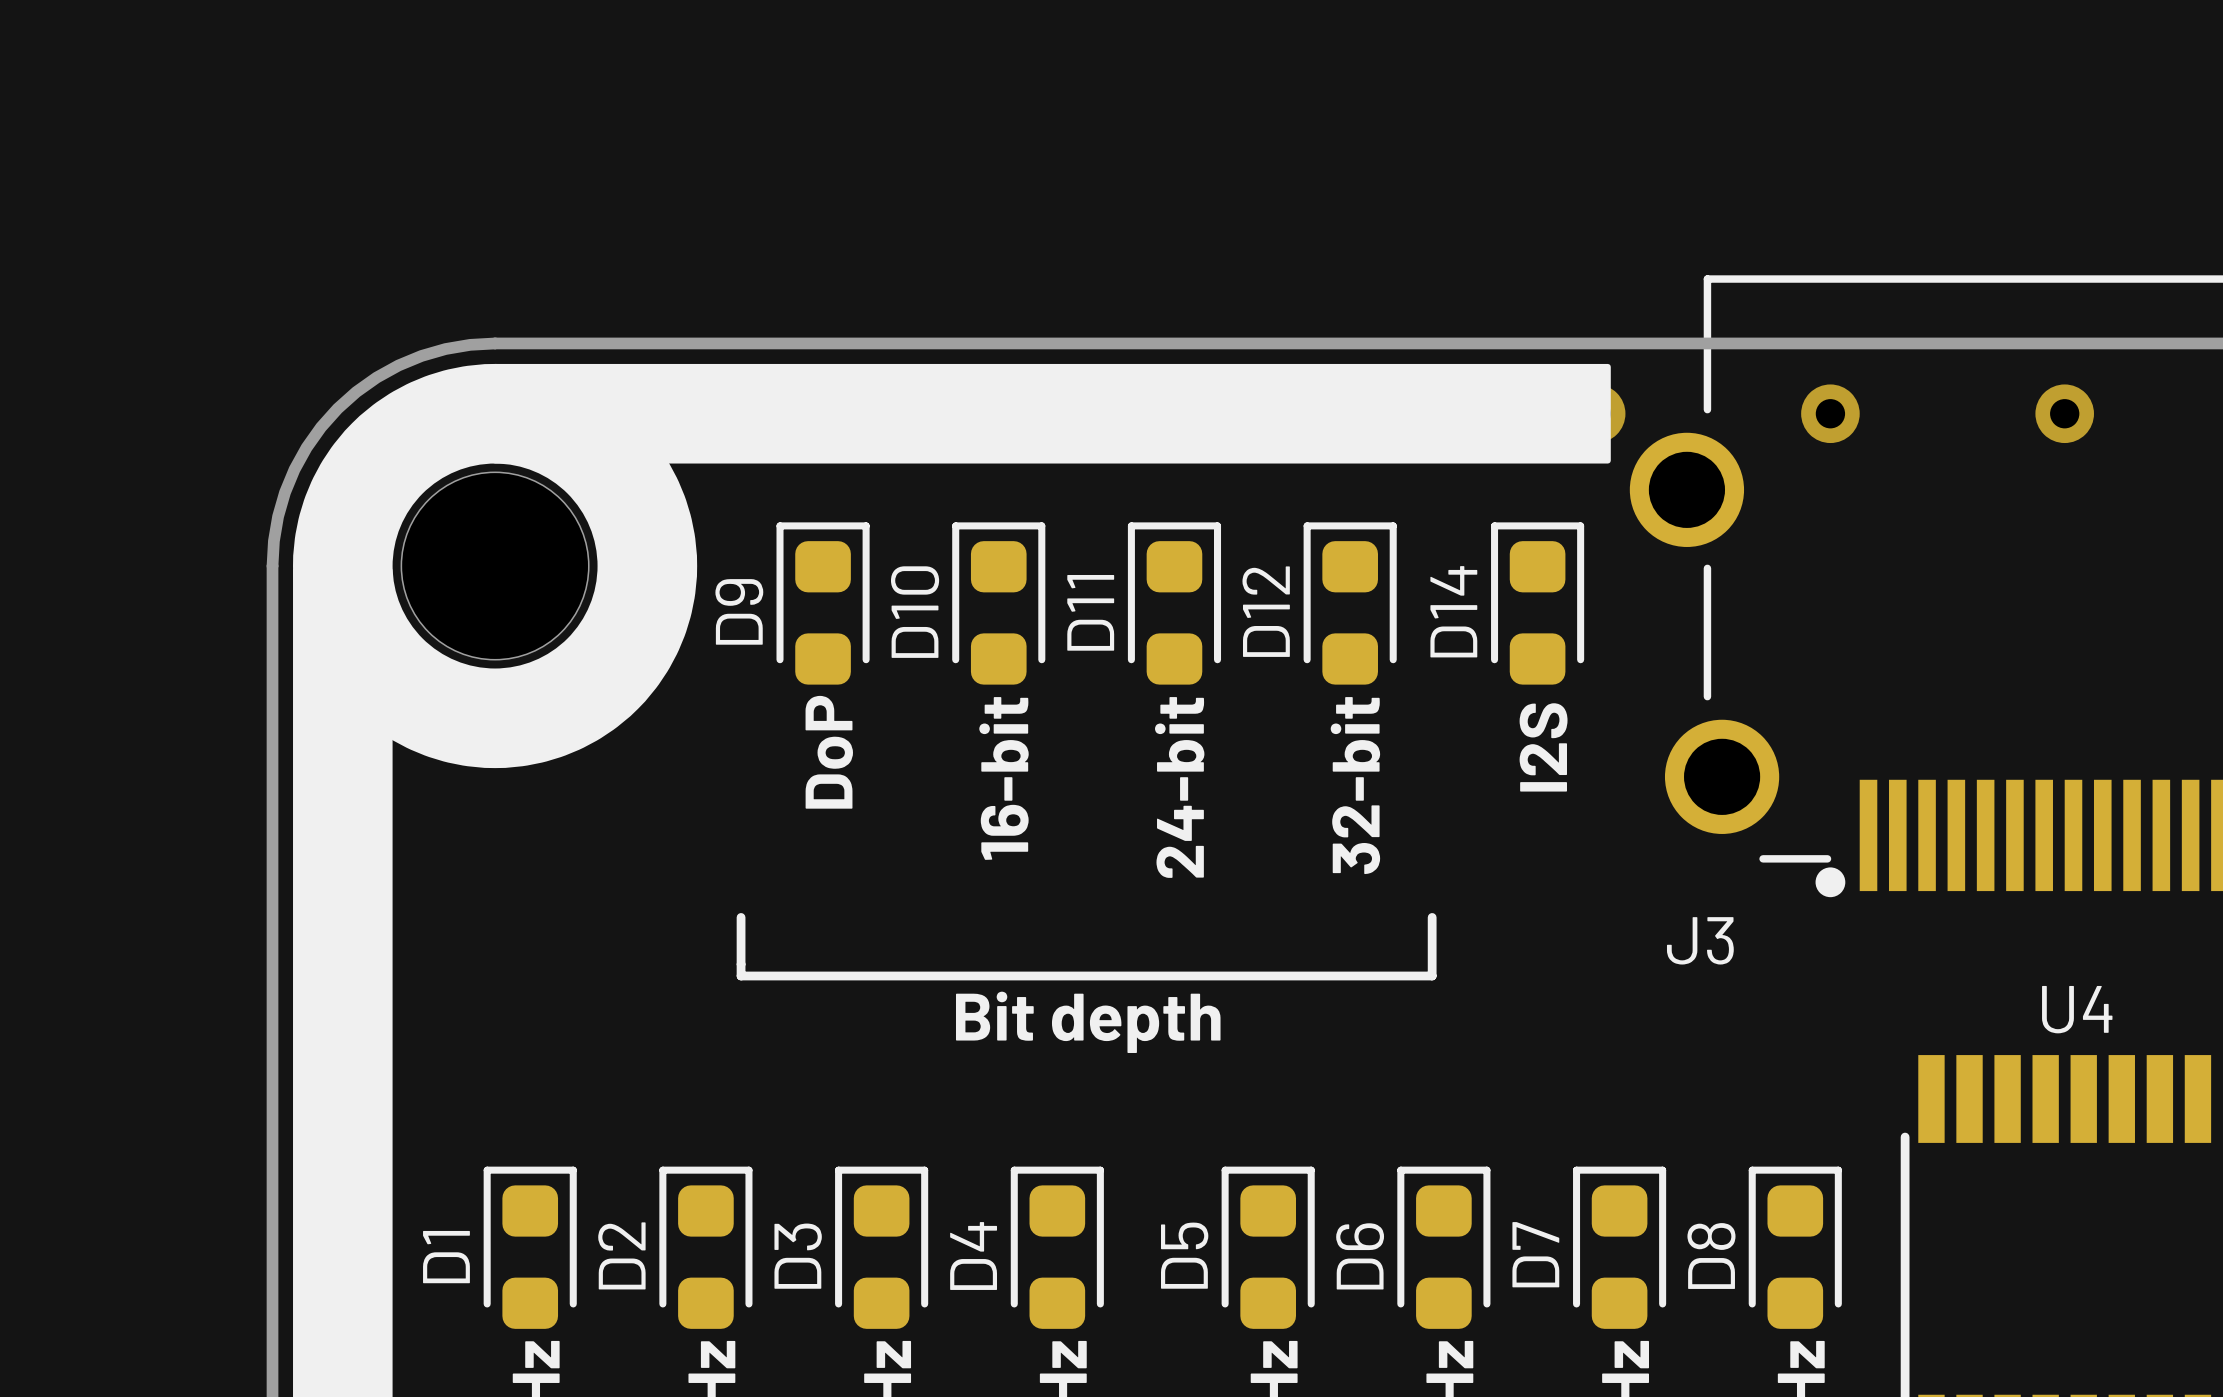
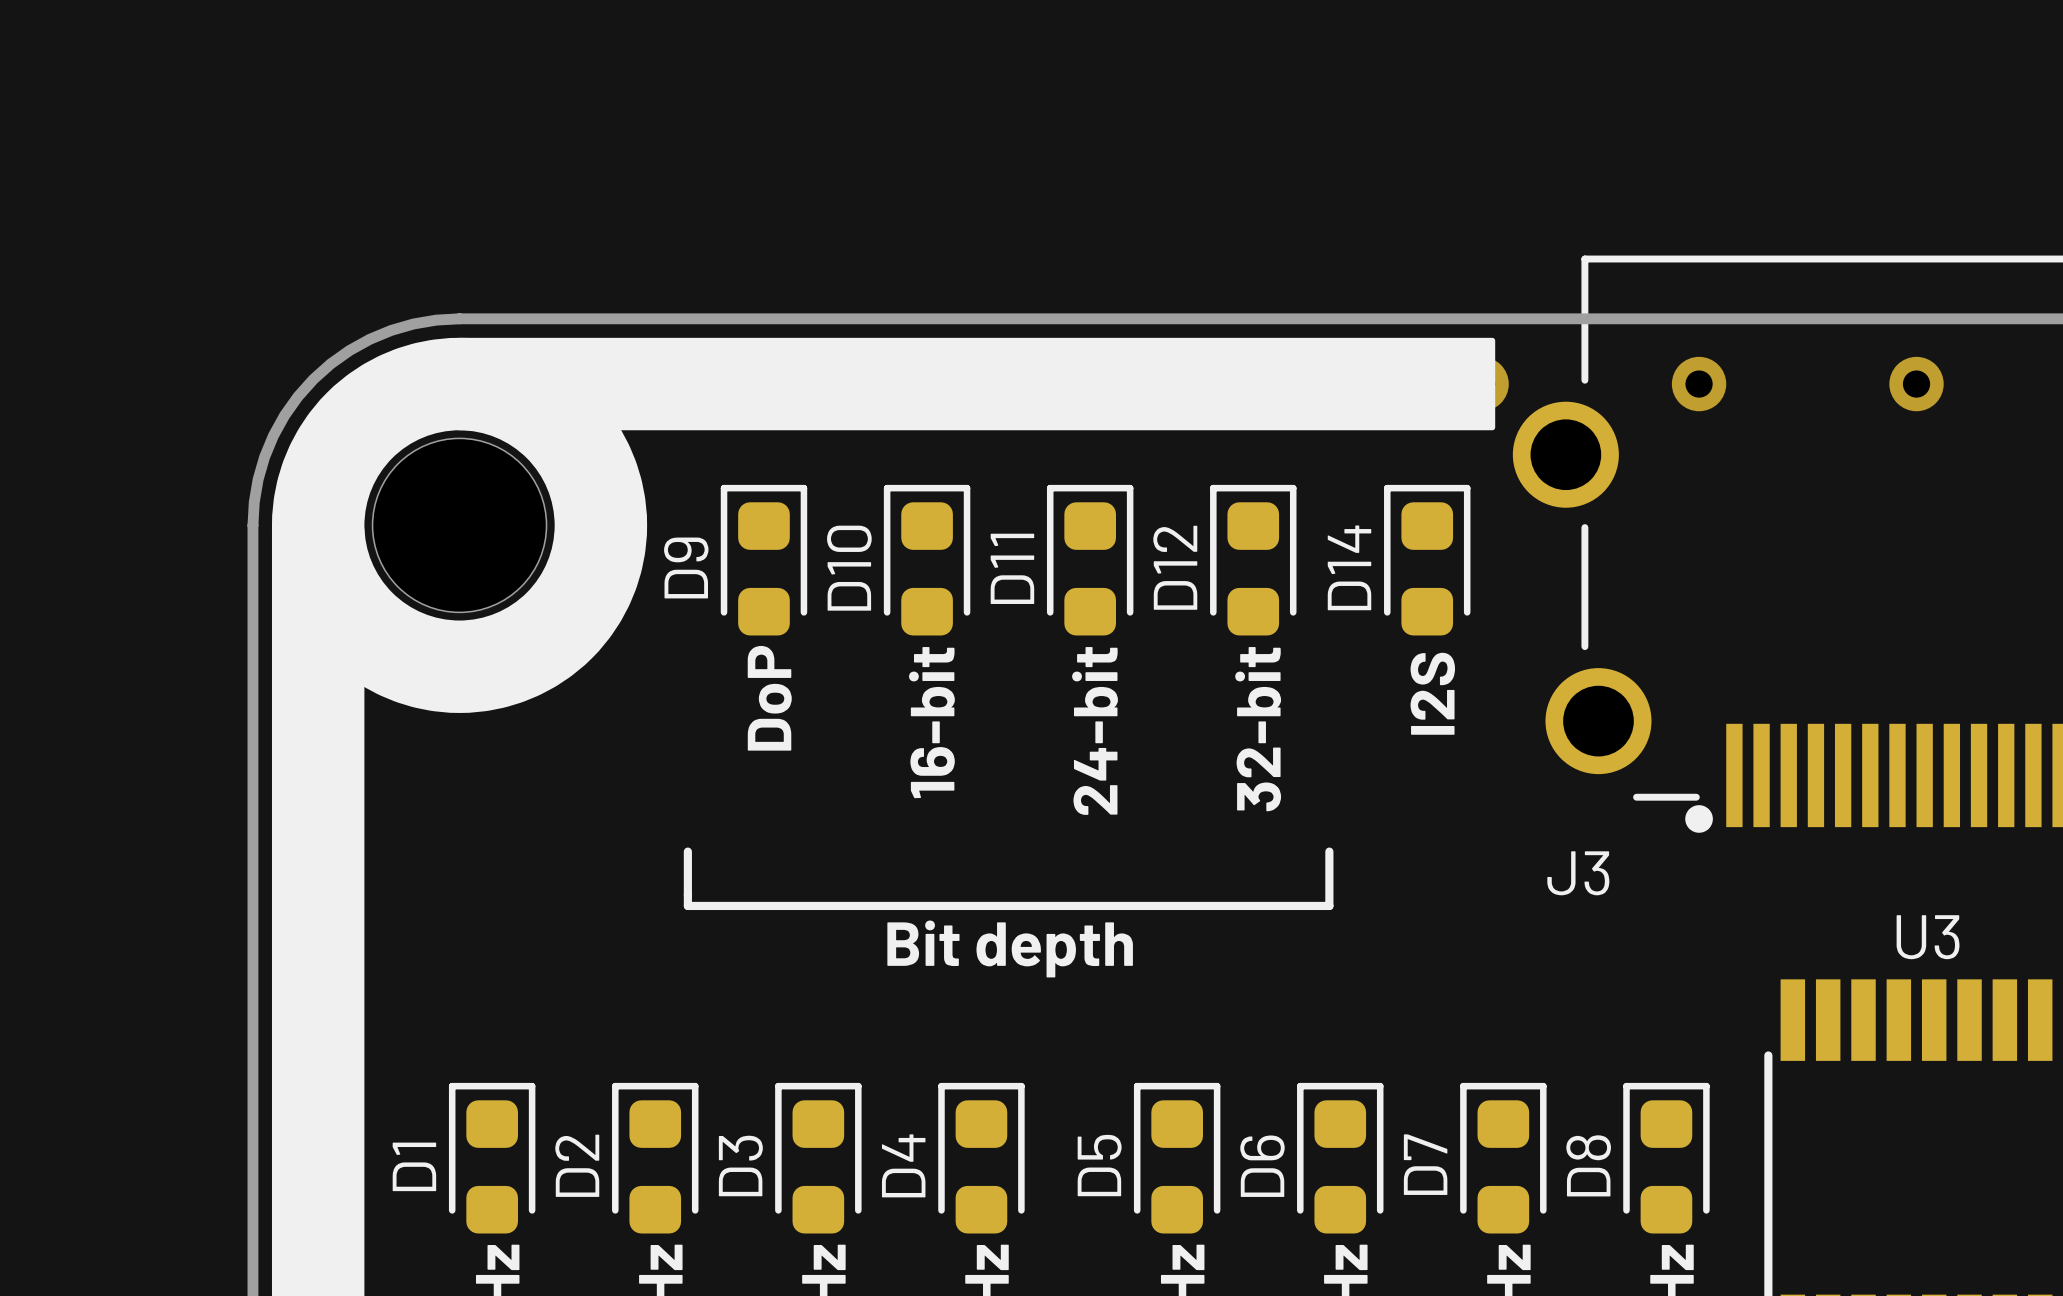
U4 name: U4 (2077, 1009) -> U3 (1928, 937)

